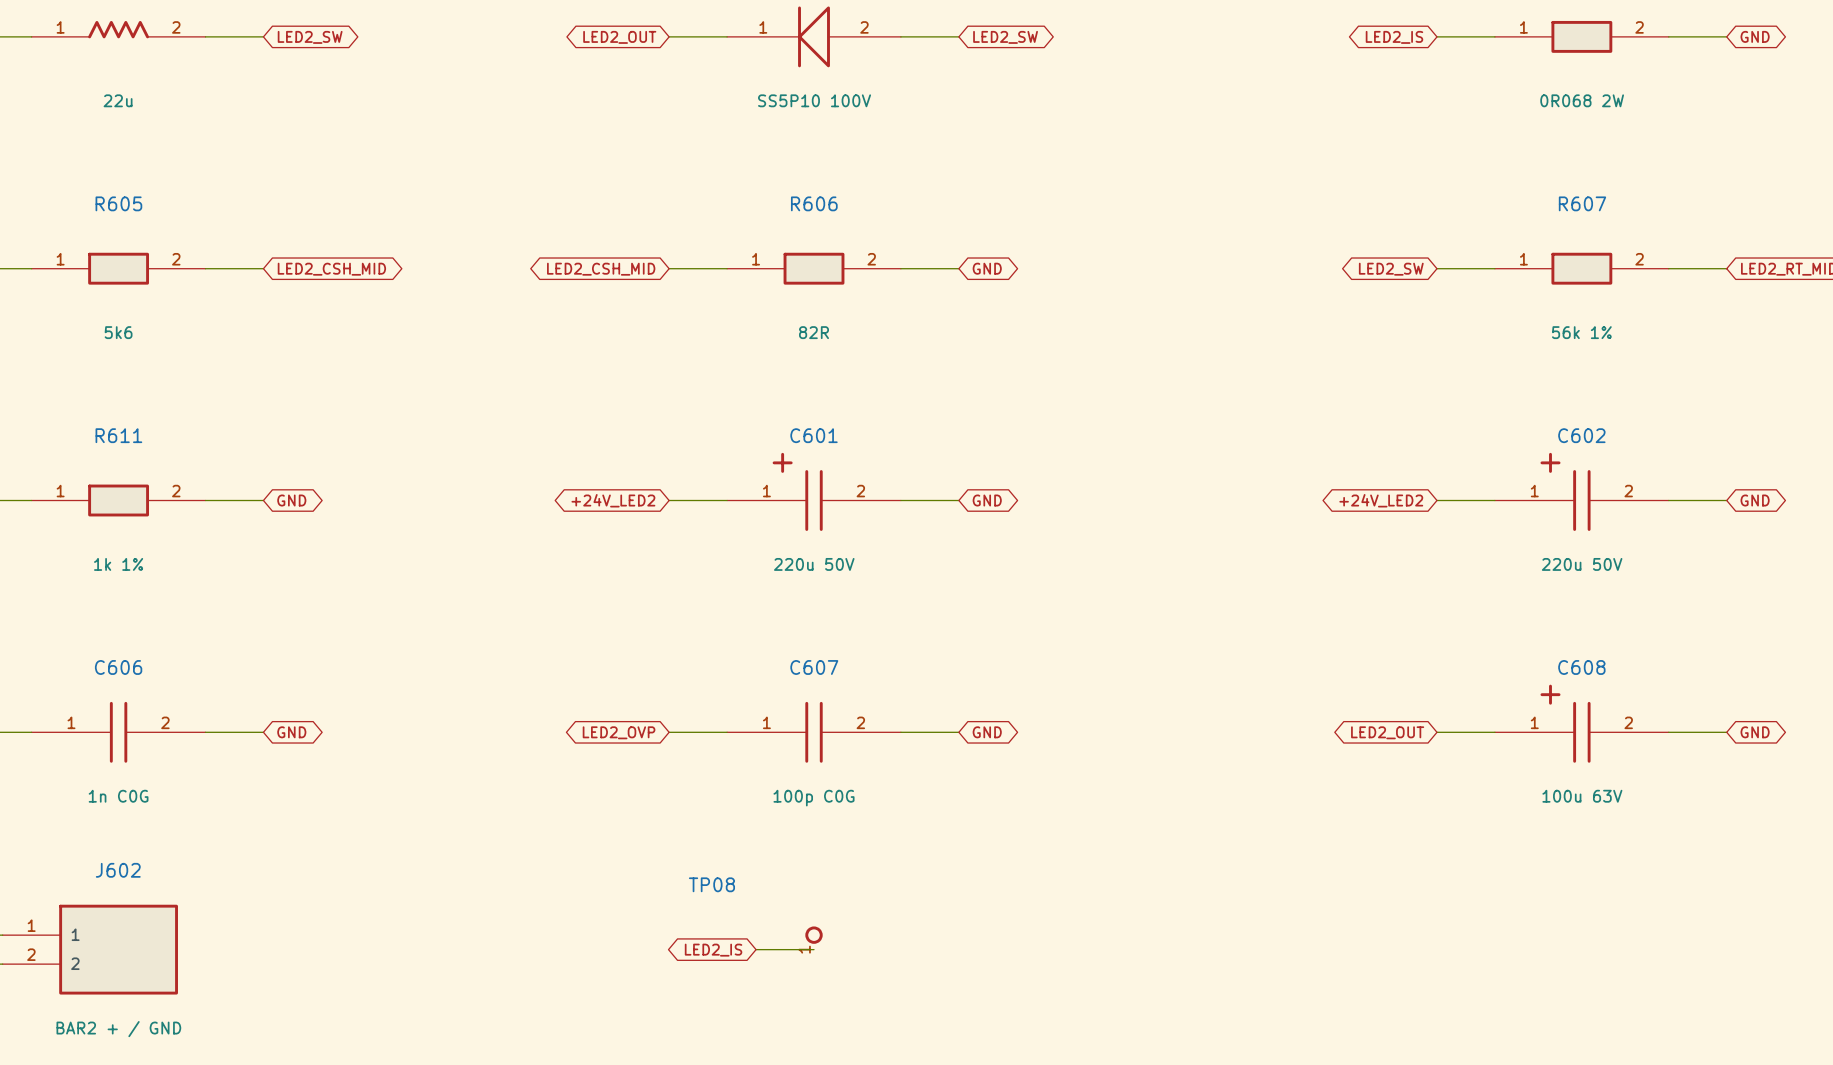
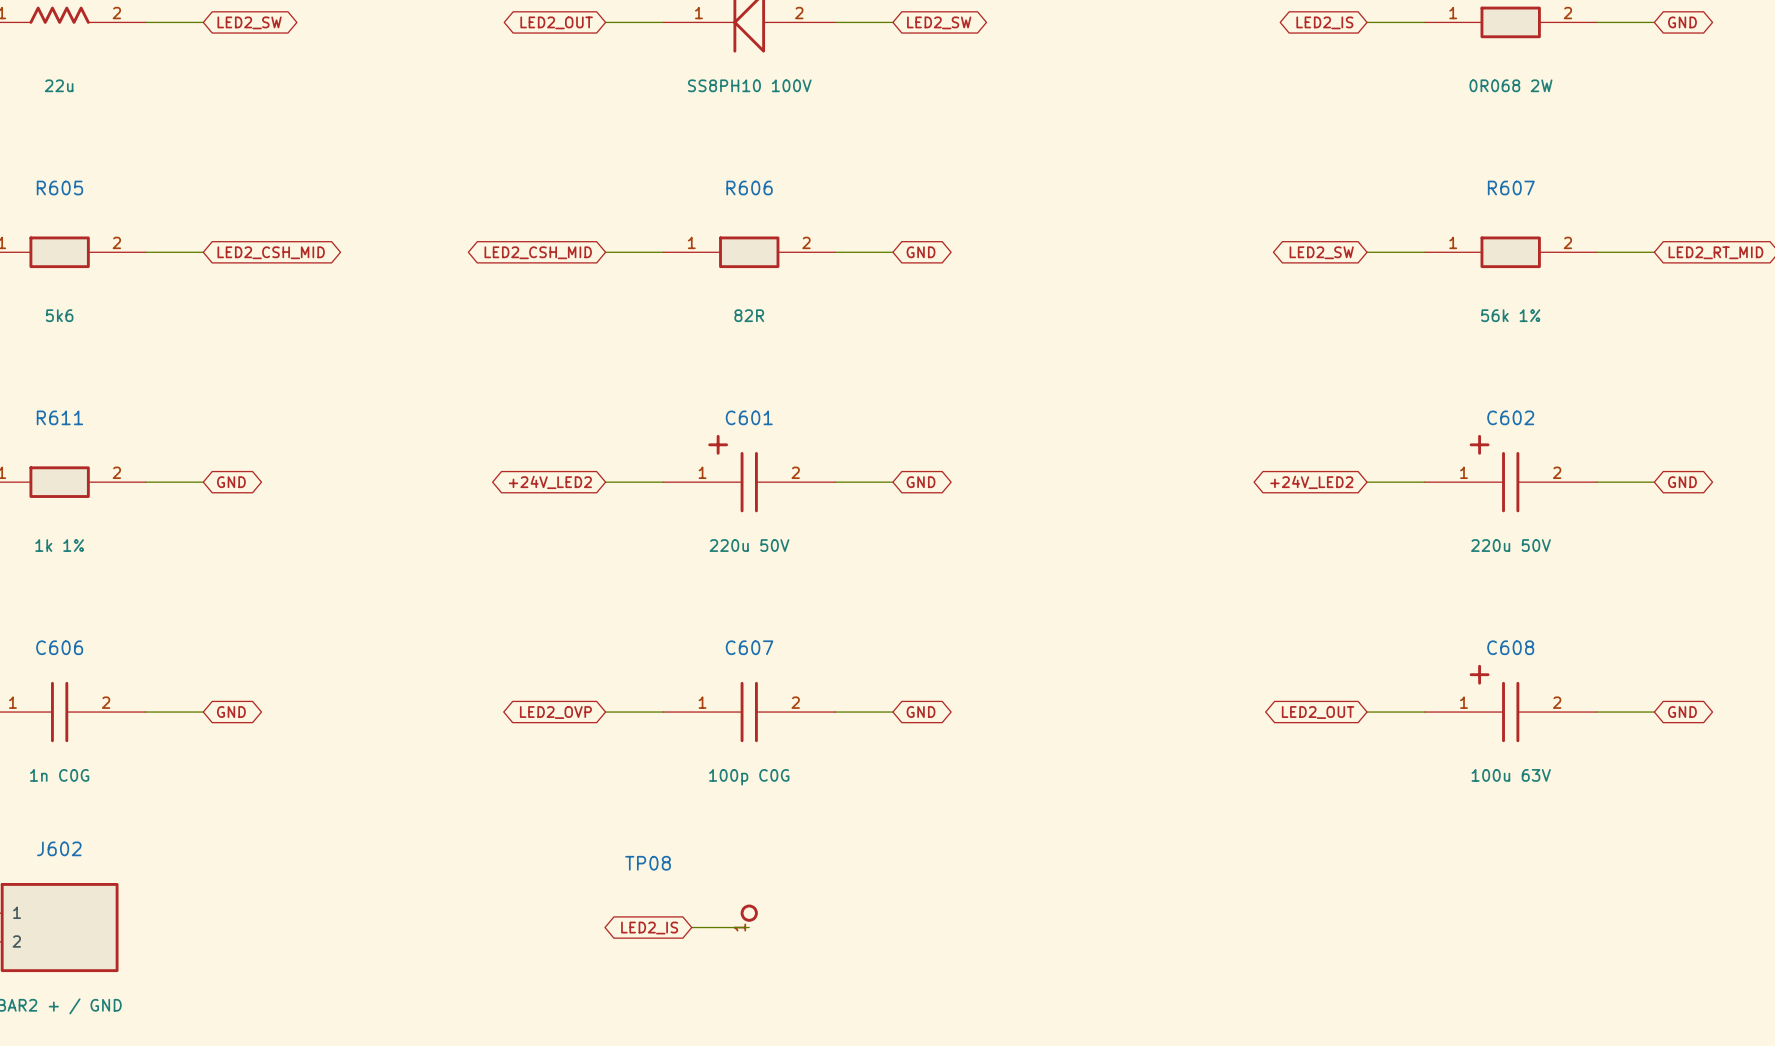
part value: SS5P10 100V (814, 100) -> SS8PH10 100V (749, 85)

